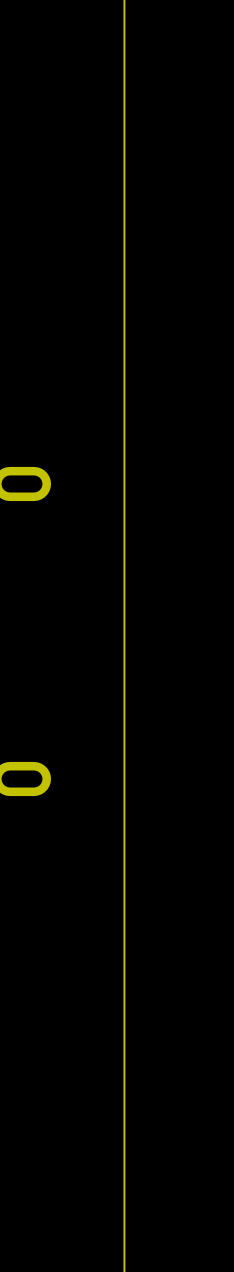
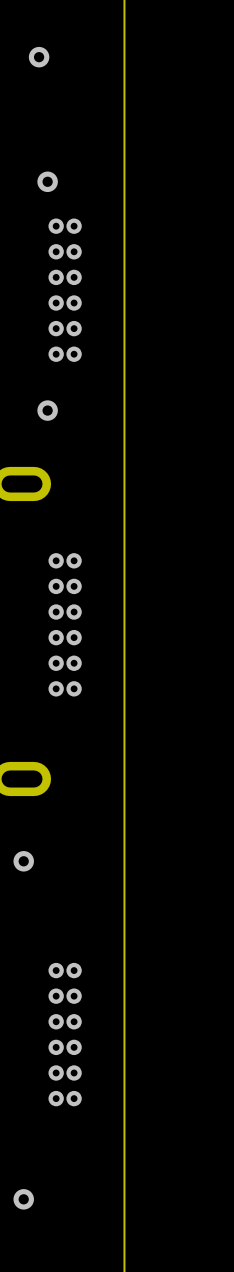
via: none -> (39, 57)
via: none -> (47, 181)
via: none -> (56, 226)
via: none -> (74, 226)
via: none -> (56, 251)
via: none -> (74, 251)
via: none -> (56, 277)
via: none -> (74, 277)
via: none -> (56, 303)
via: none -> (74, 303)
via: none -> (56, 328)
via: none -> (74, 328)
via: none -> (56, 354)
via: none -> (74, 354)
via: none -> (47, 410)
via: none -> (56, 560)
via: none -> (74, 560)
via: none -> (56, 586)
via: none -> (74, 586)
via: none -> (56, 612)
via: none -> (74, 612)
via: none -> (56, 637)
via: none -> (74, 637)
via: none -> (56, 663)
via: none -> (74, 663)
via: none -> (56, 688)
via: none -> (74, 688)
via: none -> (23, 861)
via: none -> (56, 970)
via: none -> (74, 970)
via: none -> (56, 996)
via: none -> (74, 996)
via: none -> (56, 1021)
via: none -> (74, 1021)
via: none -> (56, 1047)
via: none -> (74, 1047)
via: none -> (56, 1072)
via: none -> (74, 1072)
via: none -> (56, 1098)
via: none -> (74, 1098)
via: none -> (23, 1199)

